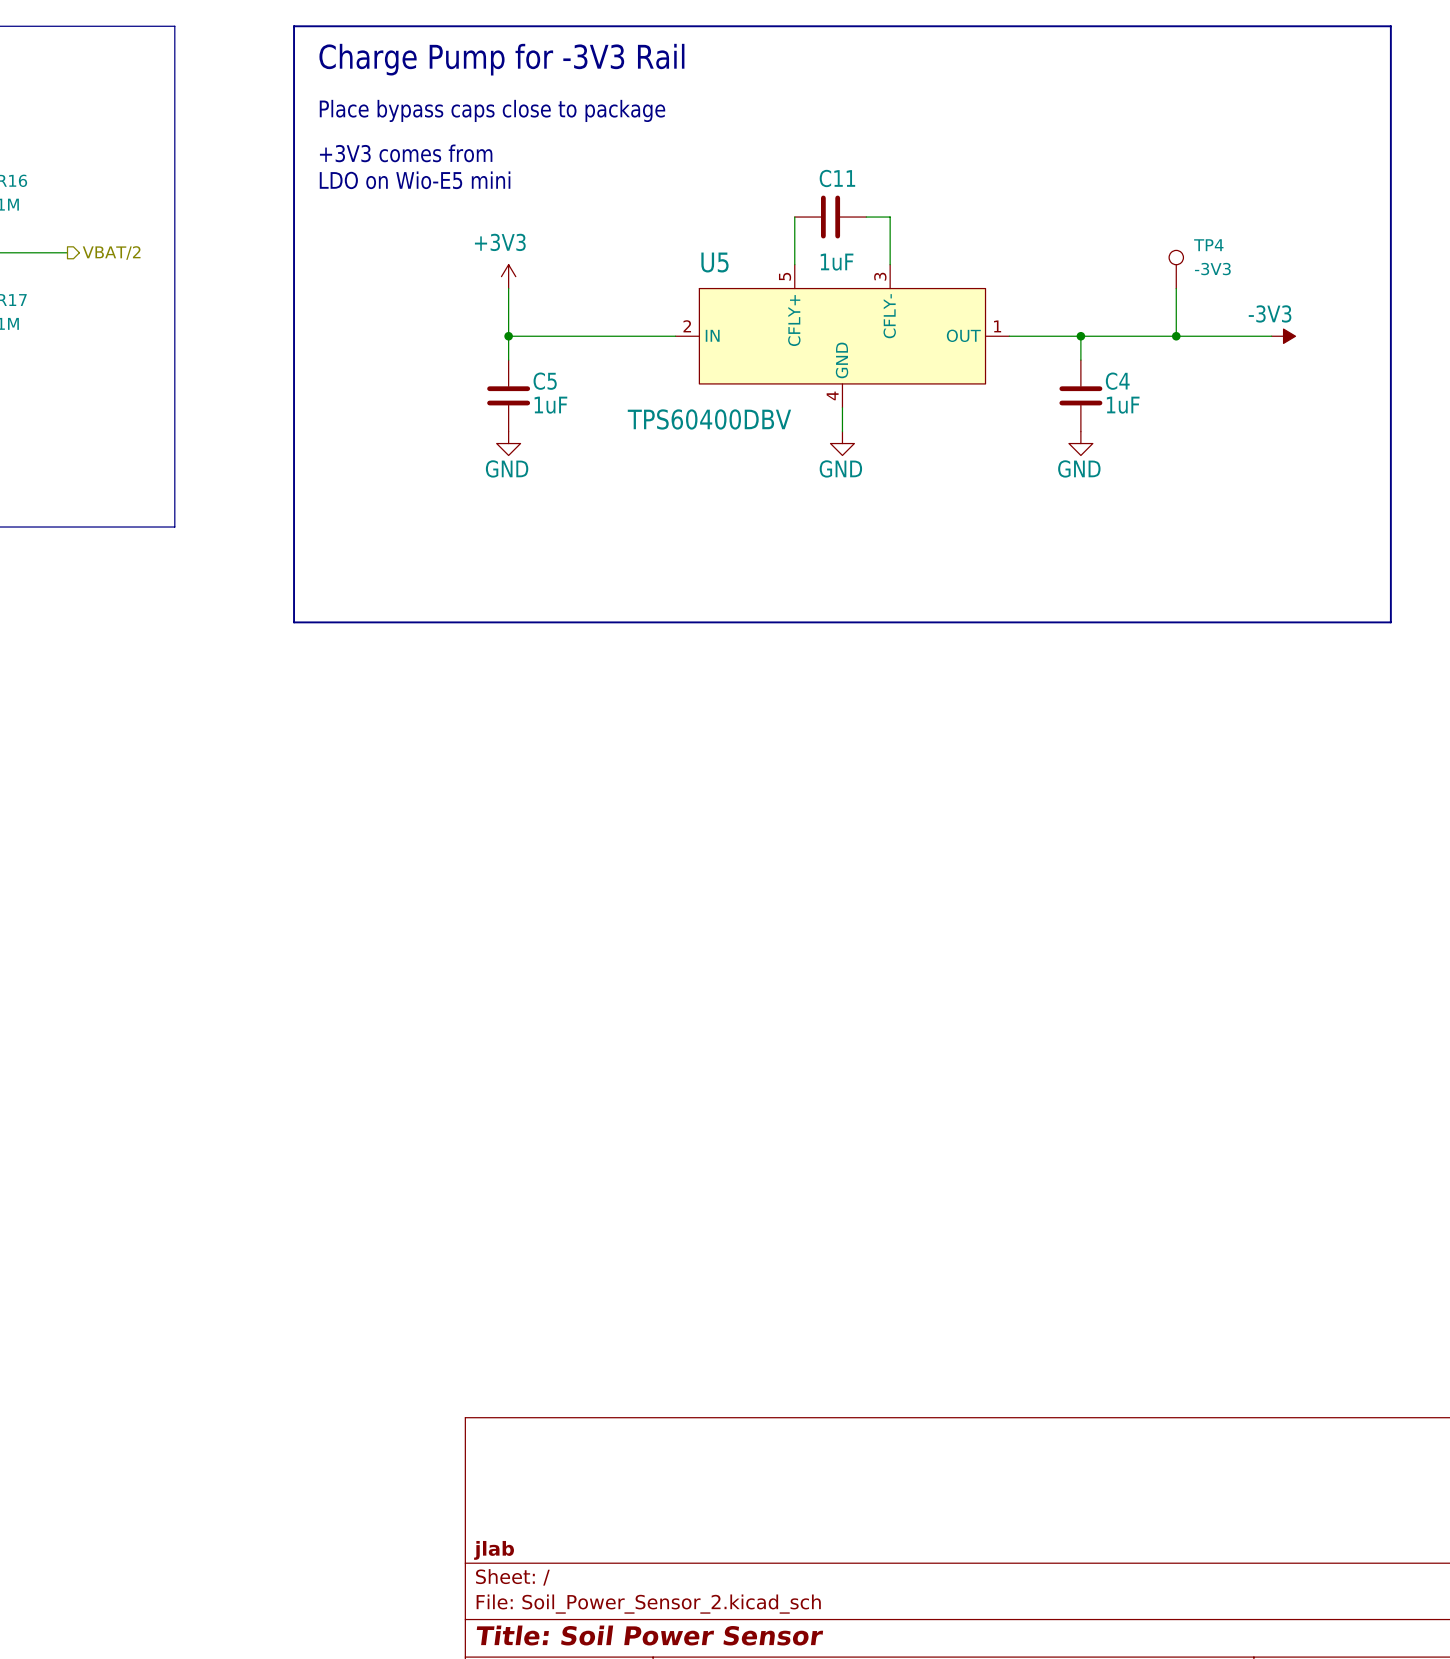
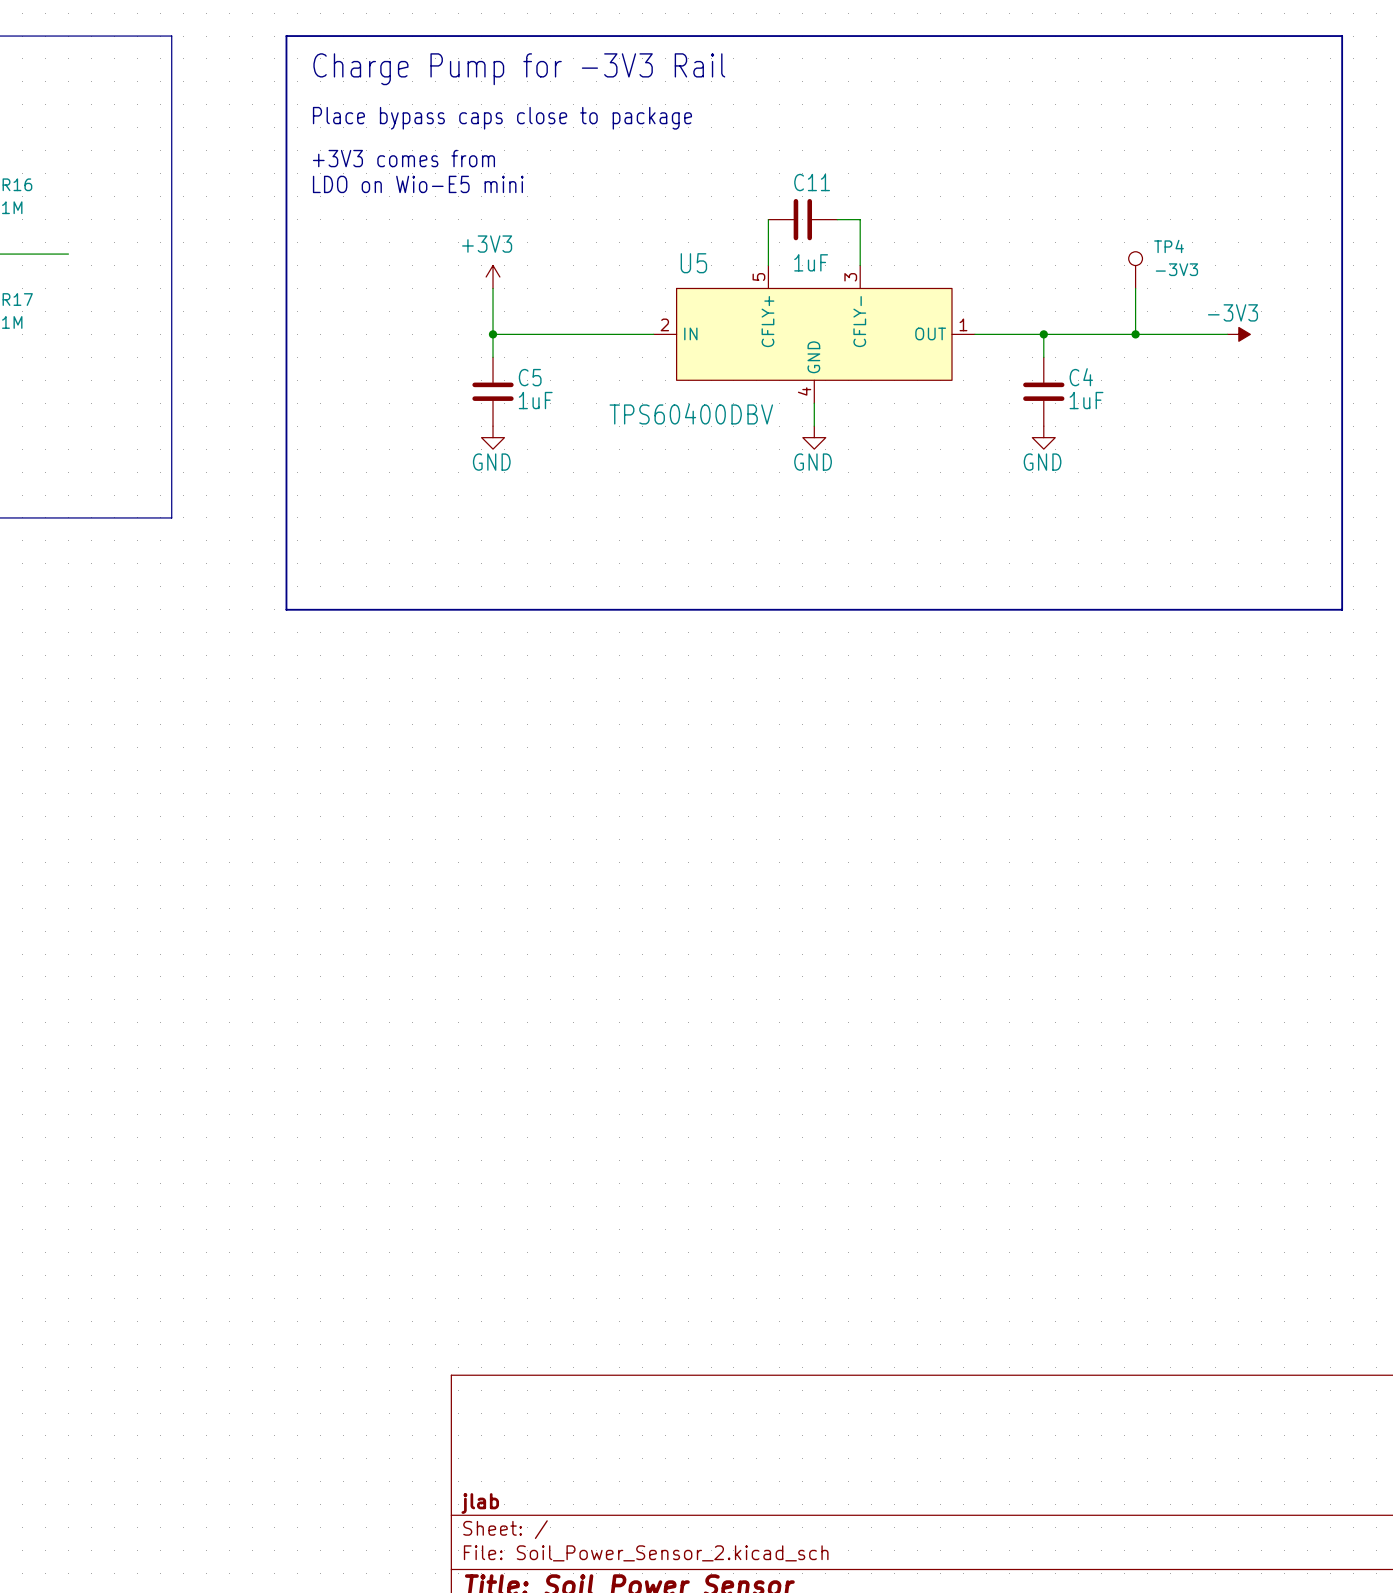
hierarchical label: VBAT/2 (111, 253) -> none

